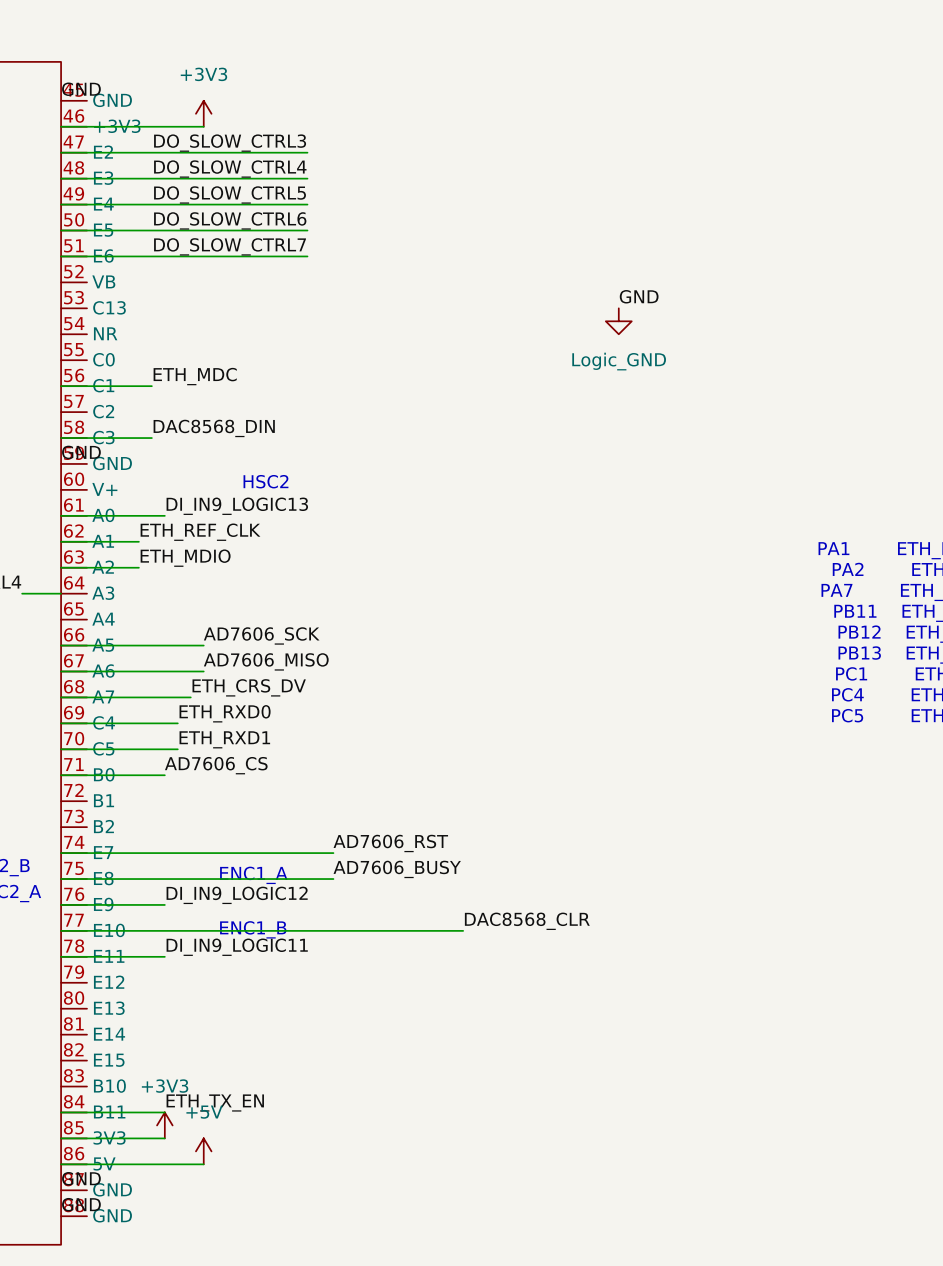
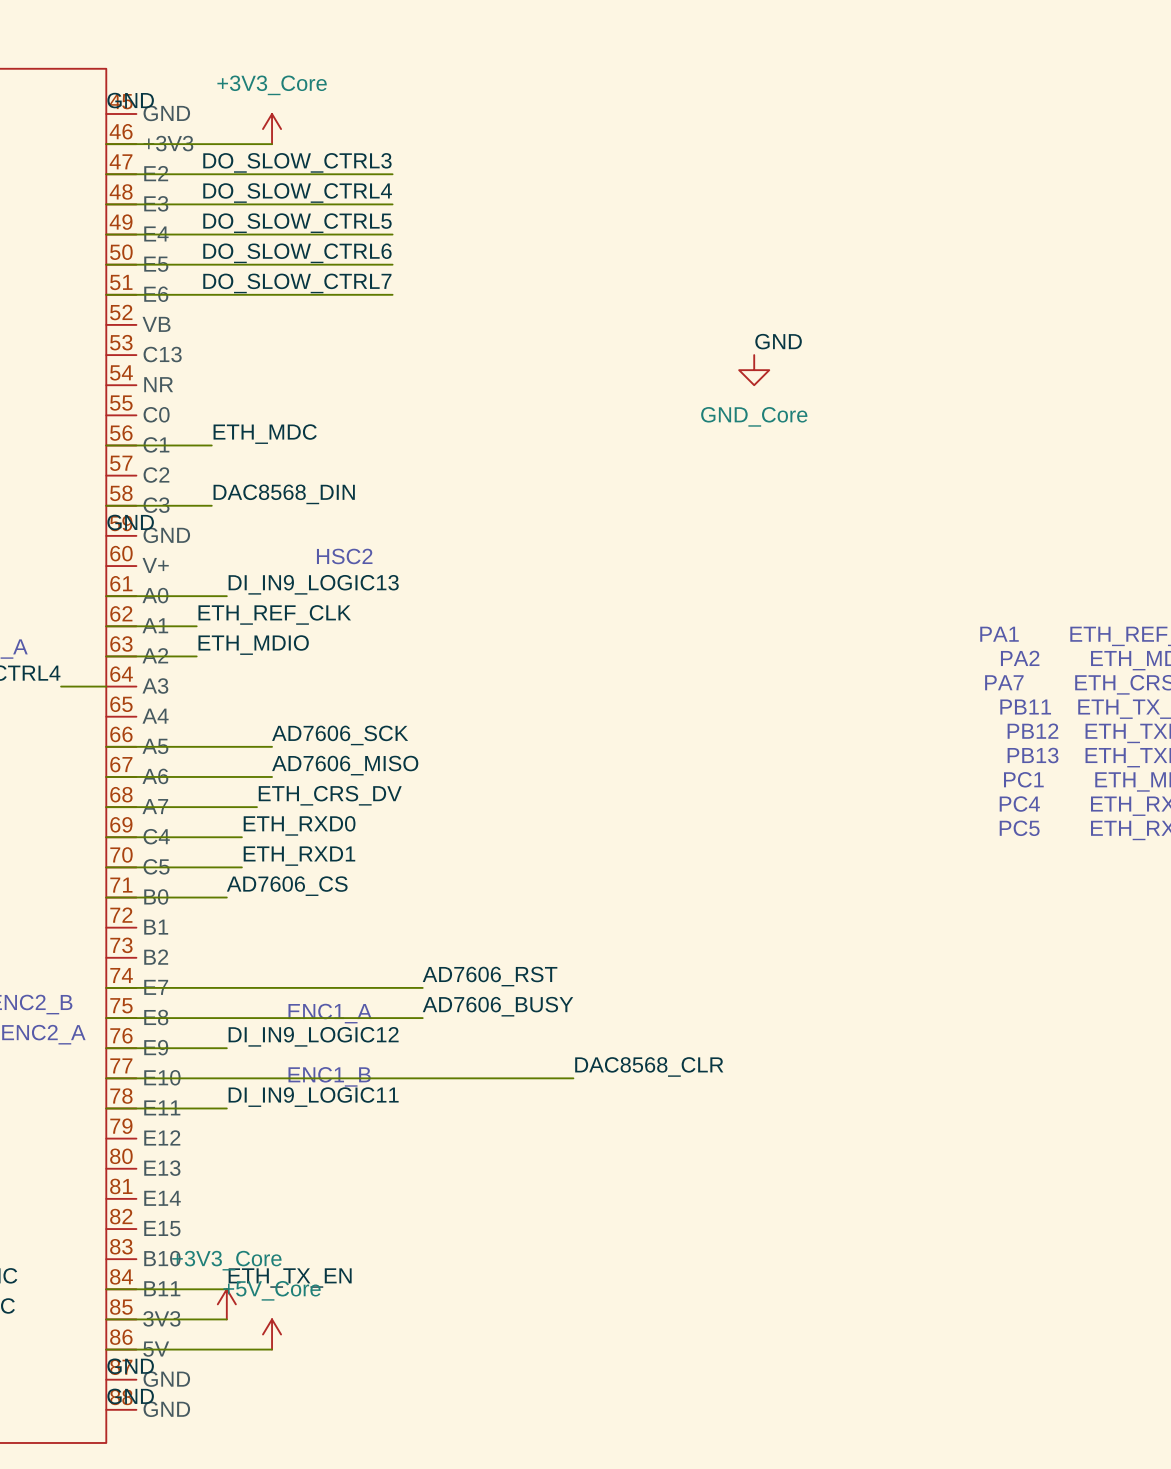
power symbol: +3V3 (203, 113) -> +3V3_Core (272, 129)
power symbol: Logic_GND (618, 321) -> GND_Core (754, 370)
power symbol: +3V3 (164, 1125) -> +3V3_Core (226, 1304)
power symbol: +5V (203, 1151) -> +5V_Core (272, 1334)

